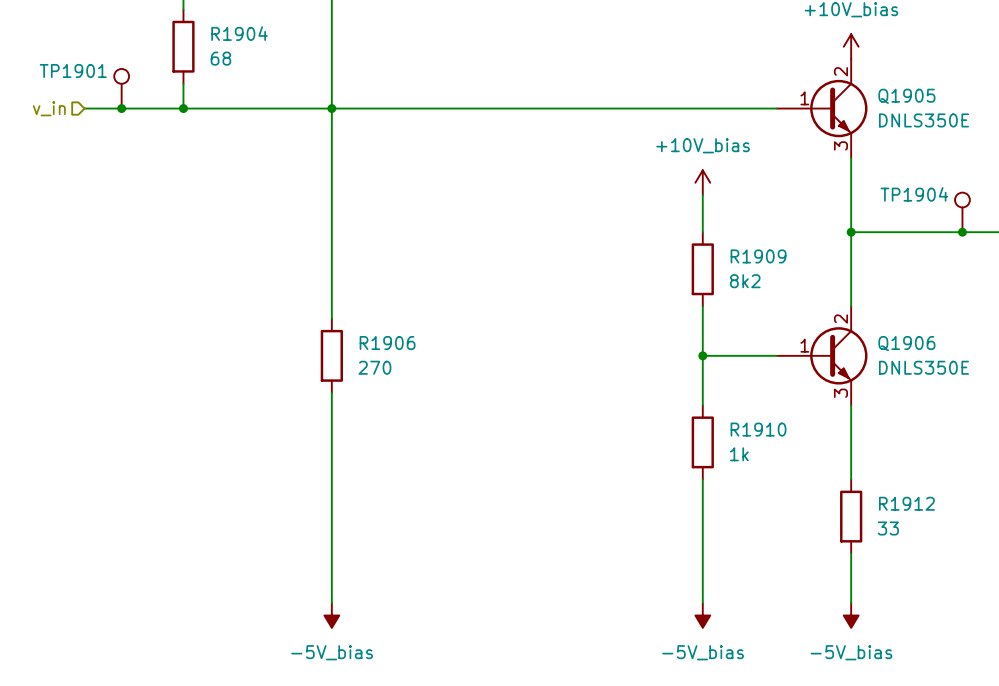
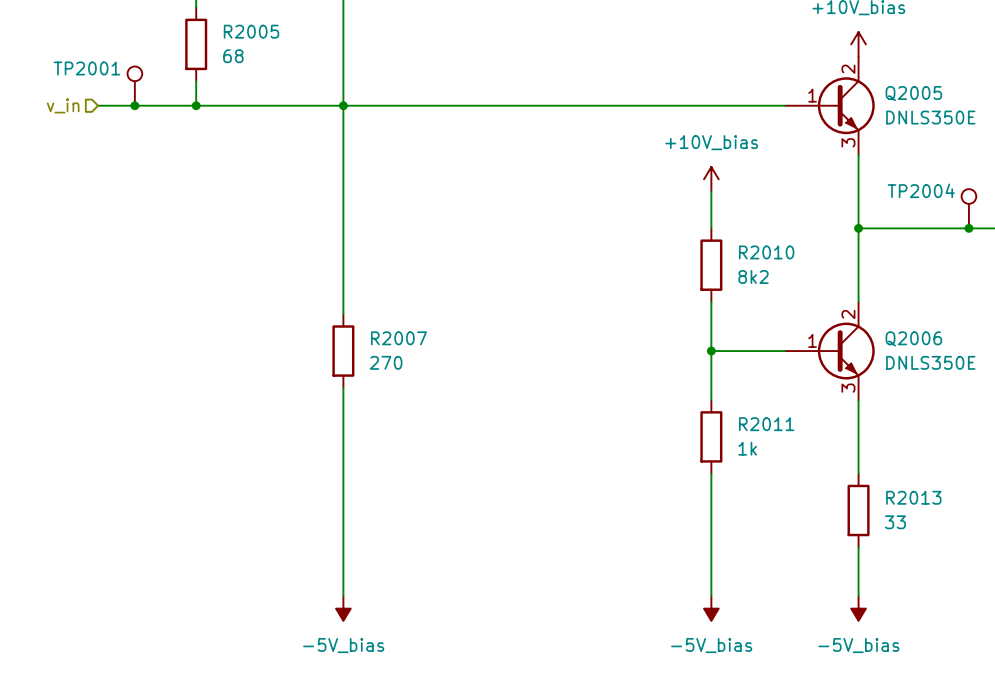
R1904 name: R1904 (239, 33) -> R2005 (251, 31)
TP1901 name: TP1901 (73, 70) -> TP2001 (86, 68)
Q1905 name: Q1905 (906, 96) -> Q2005 (913, 93)
TP1904 name: TP1904 (914, 194) -> TP2004 (921, 190)
R1909 name: R1909 (758, 256) -> R2010 (766, 252)
R1906 name: R1906 (387, 343) -> R2007 (398, 338)
Q1906 name: Q1906 (906, 343) -> Q2006 (913, 338)
R1910 name: R1910 (758, 429) -> R2011 (766, 424)
R1912 name: R1912 (906, 503) -> R2013 (913, 497)

